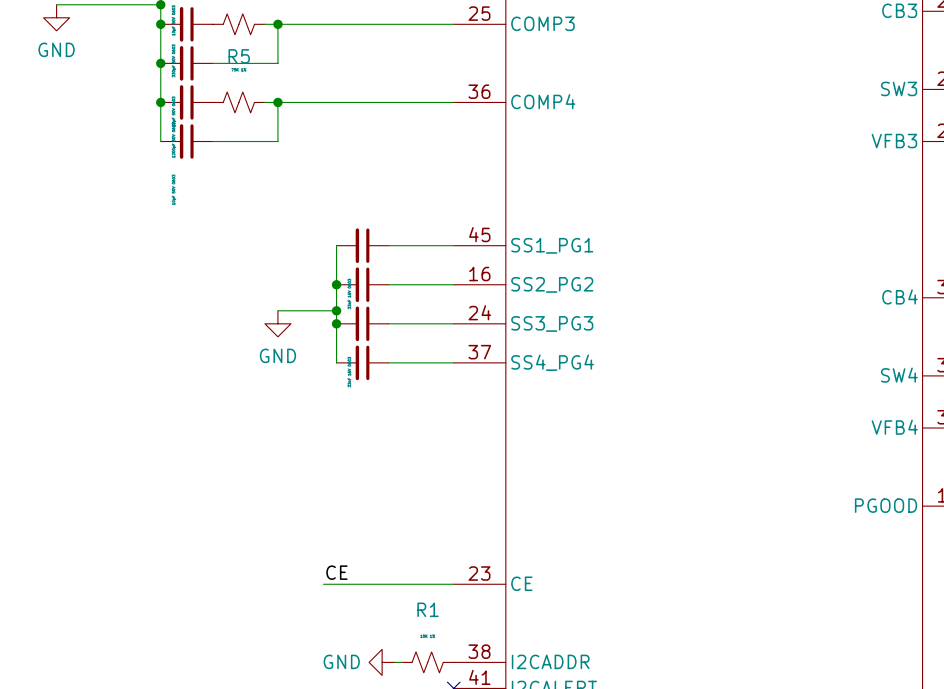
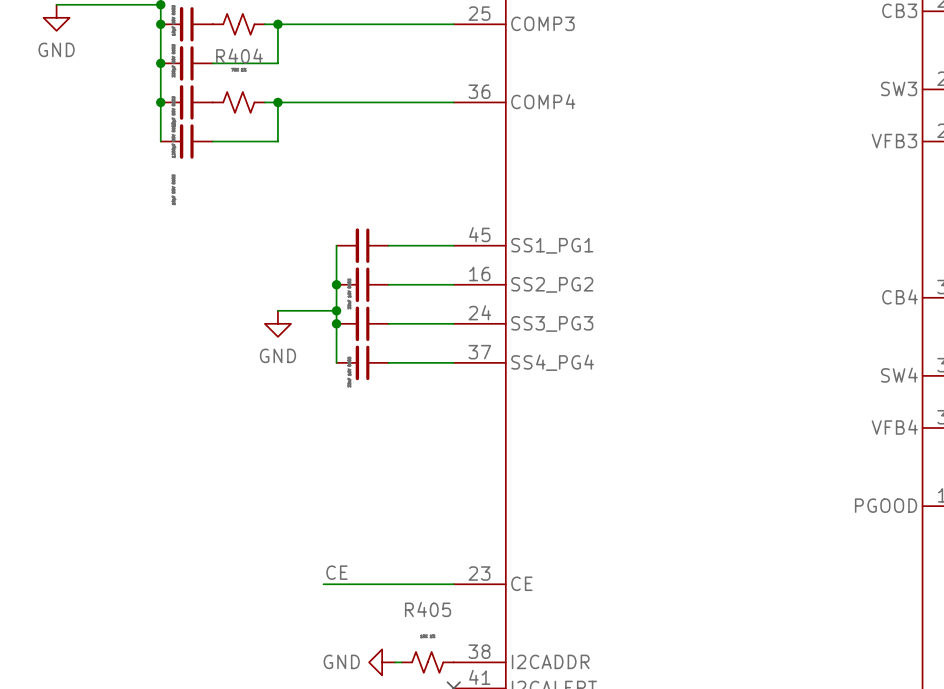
R5 name: R5 (239, 56) -> R404 (239, 56)
R1 name: R1 (428, 609) -> R405 (428, 609)

